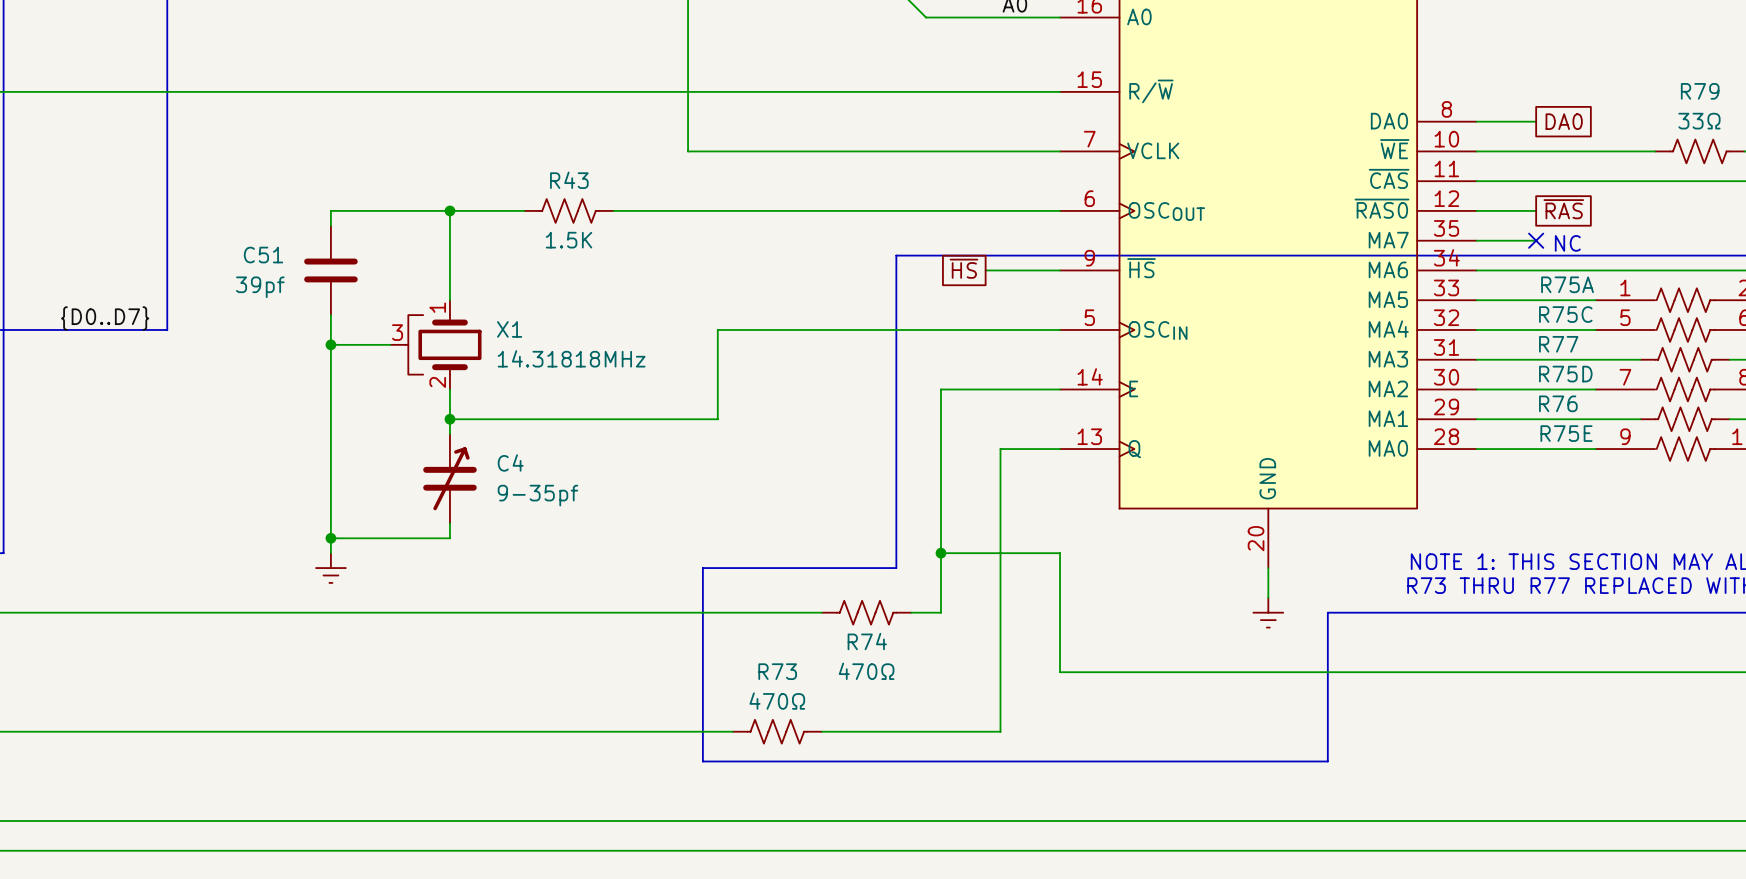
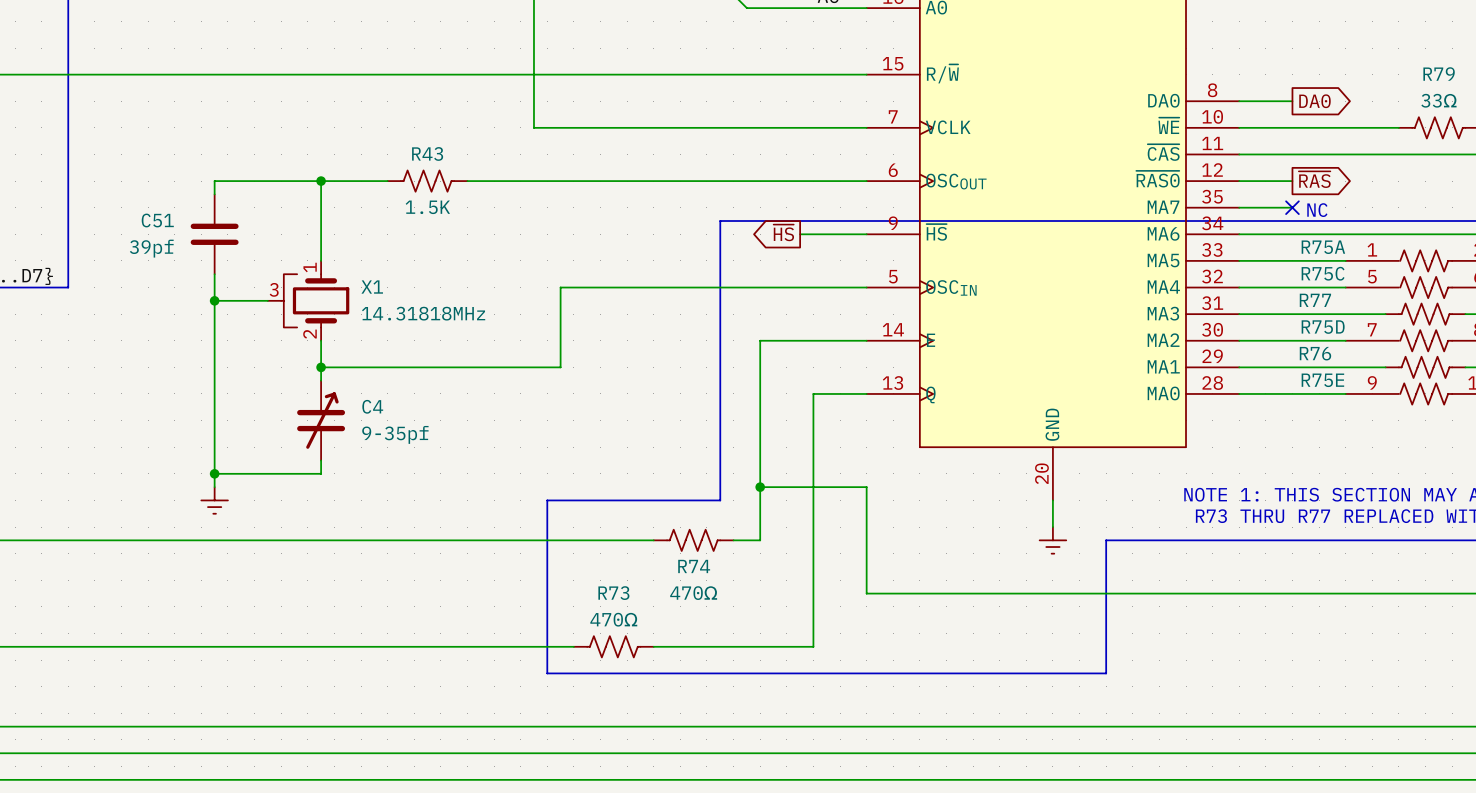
global label shape: passive (1564, 121) -> output (1314, 101)
global label shape: passive (1563, 209) -> output (1314, 179)
global label shape: passive (963, 268) -> output (783, 232)

